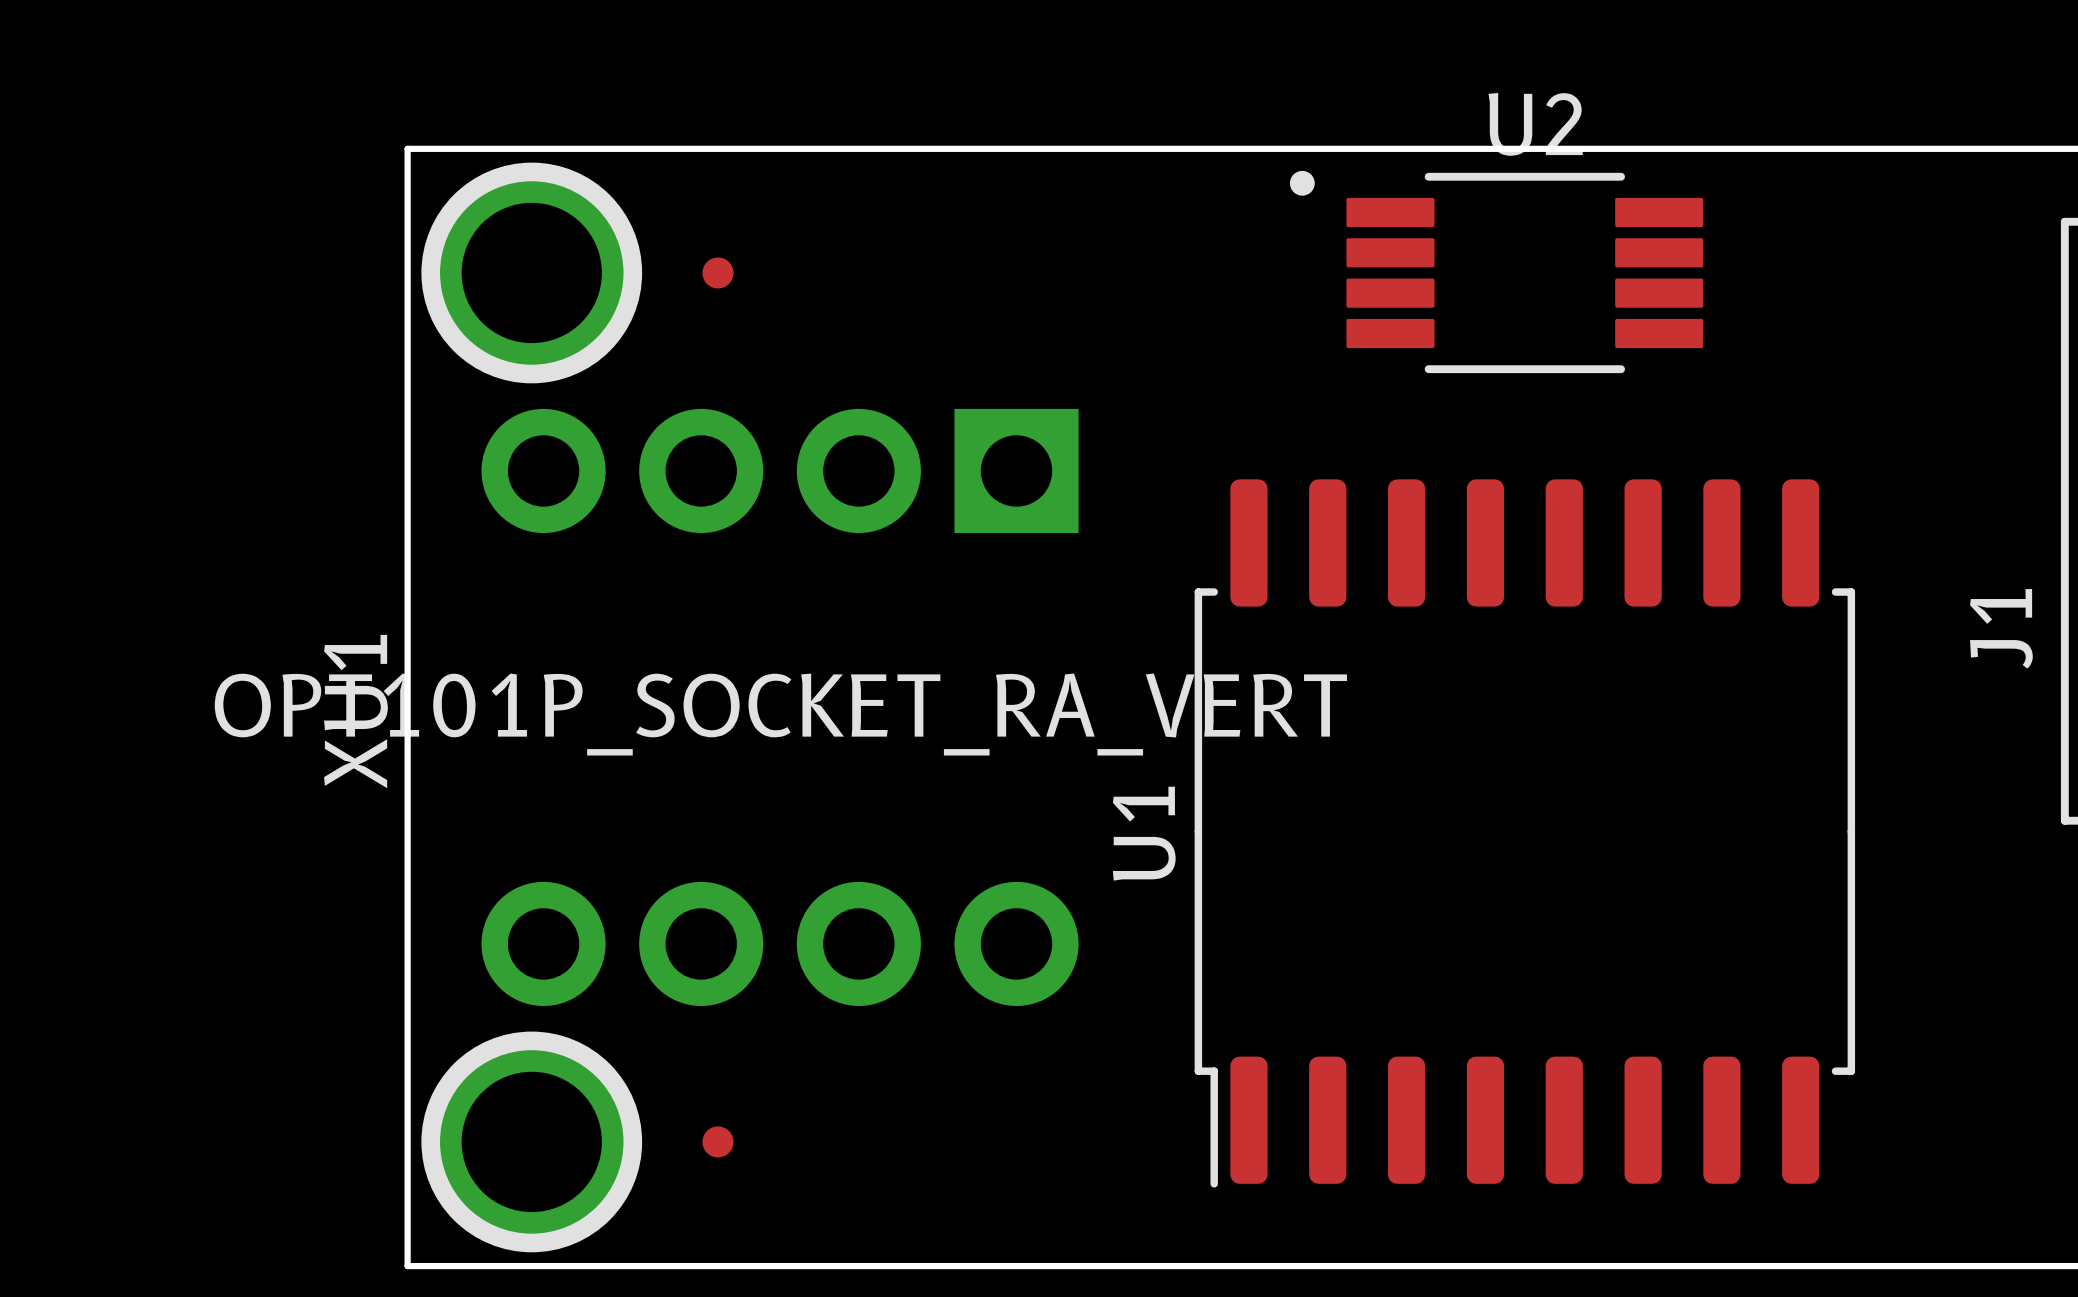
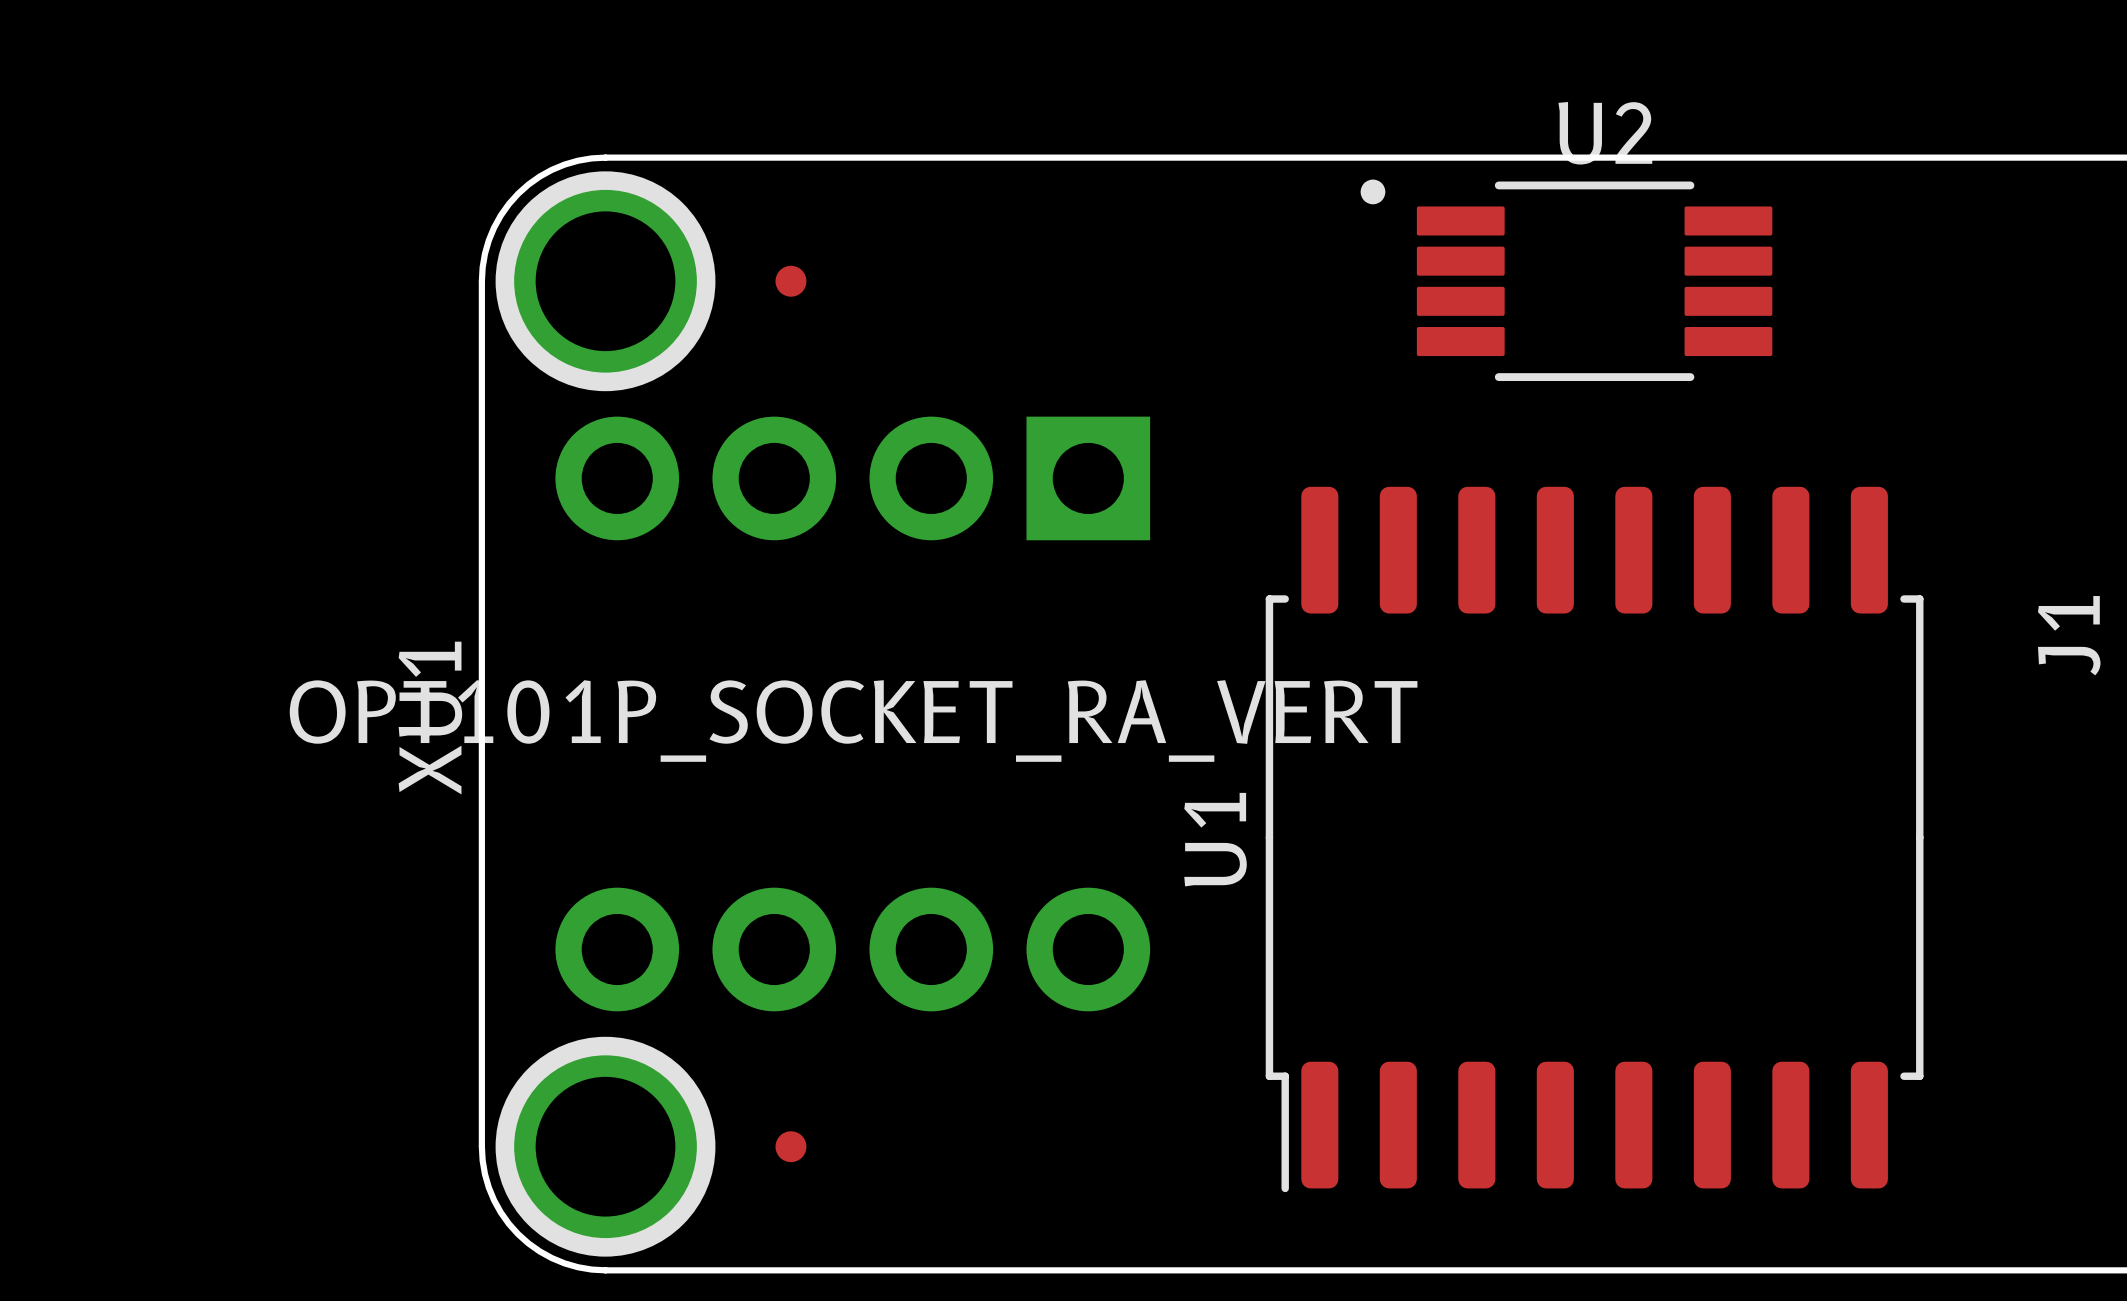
board edge: (531, 148) (407, 148) (407, 272) -> (605, 157) (578, 160) (551, 169) (539, 176) (518, 193) (508, 204) (494, 227) (484, 253) (481, 281)
board edge: (407, 1141) (407, 1266) (531, 1266) -> (481, 1146) (484, 1174) (494, 1200) (508, 1223) (518, 1234) (528, 1243) (551, 1258) (578, 1267) (605, 1270)

